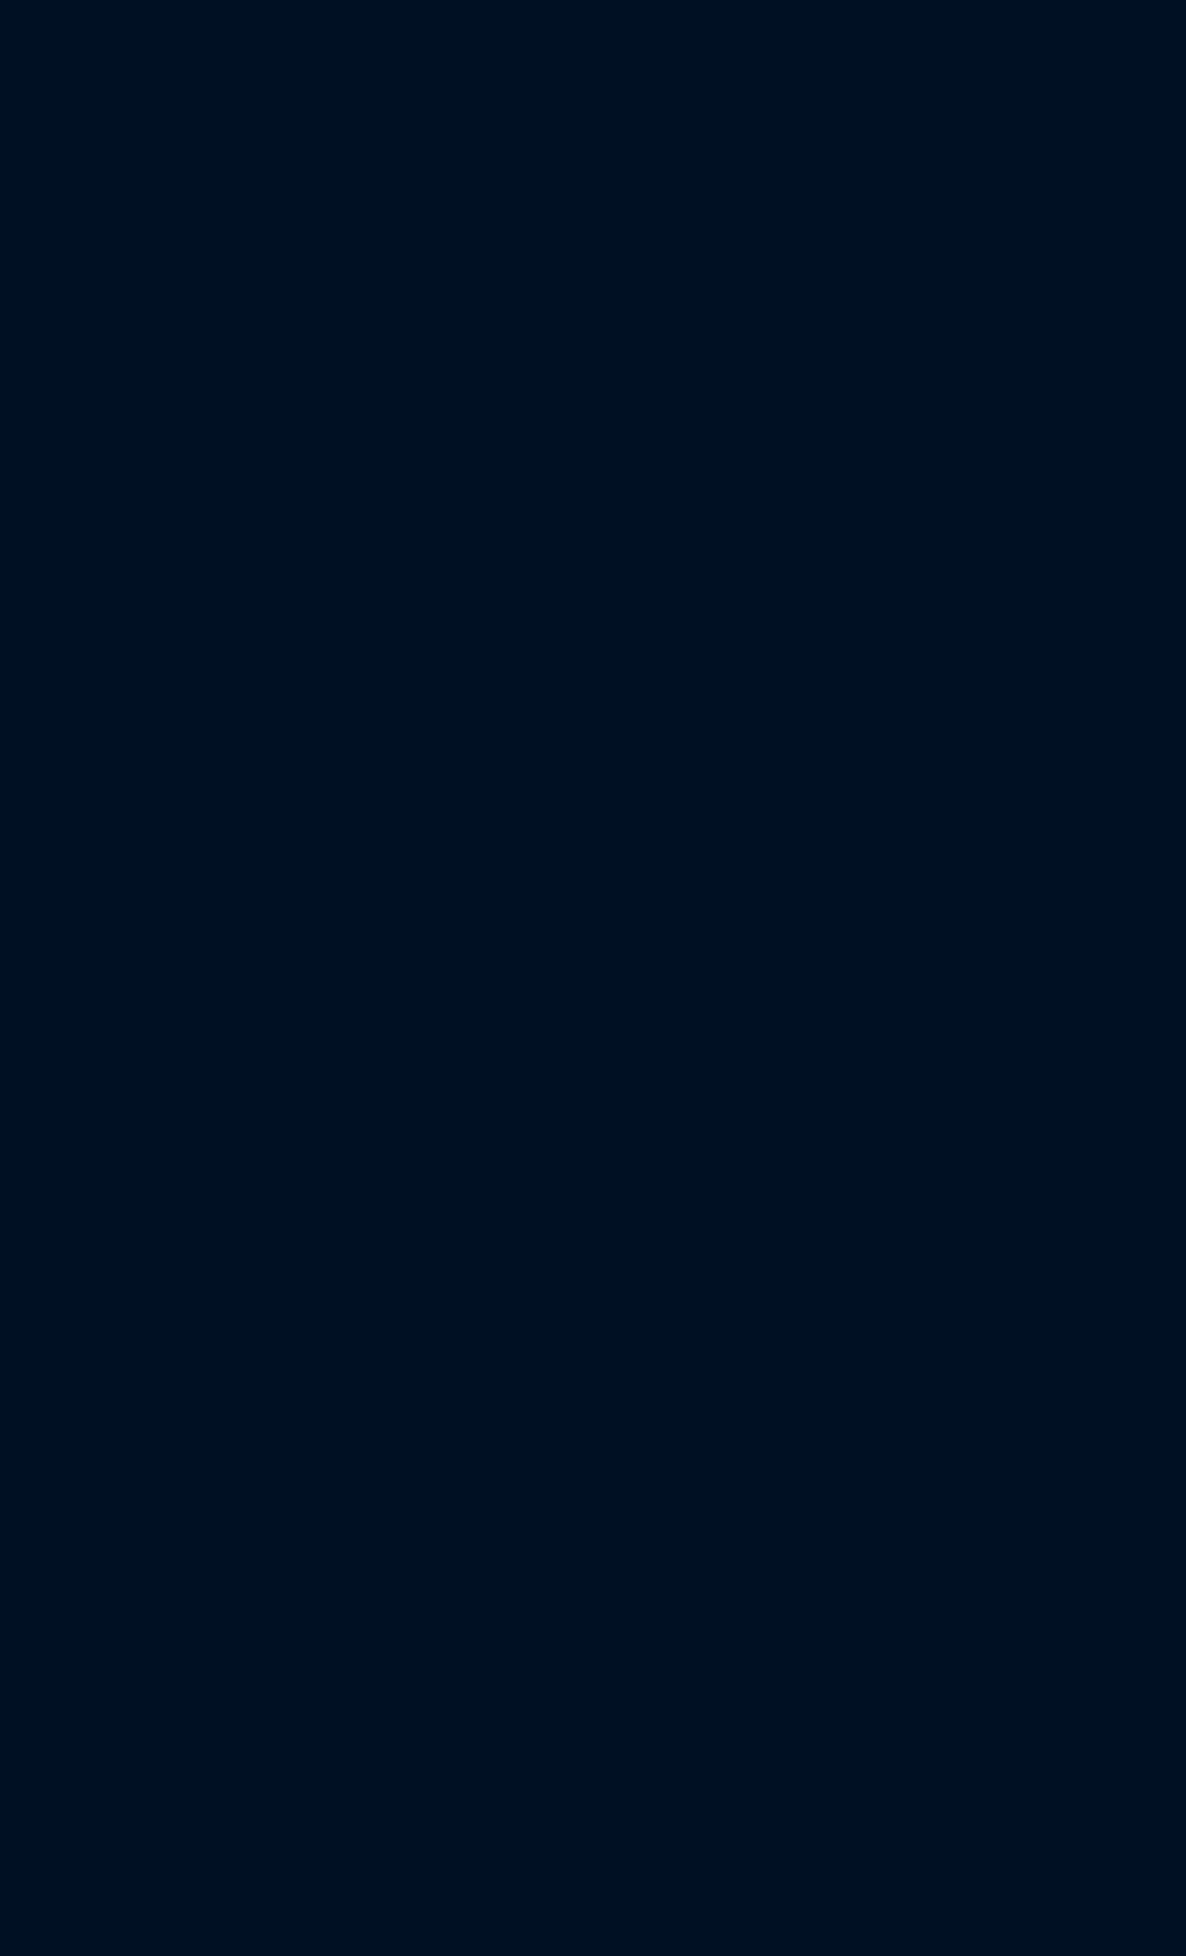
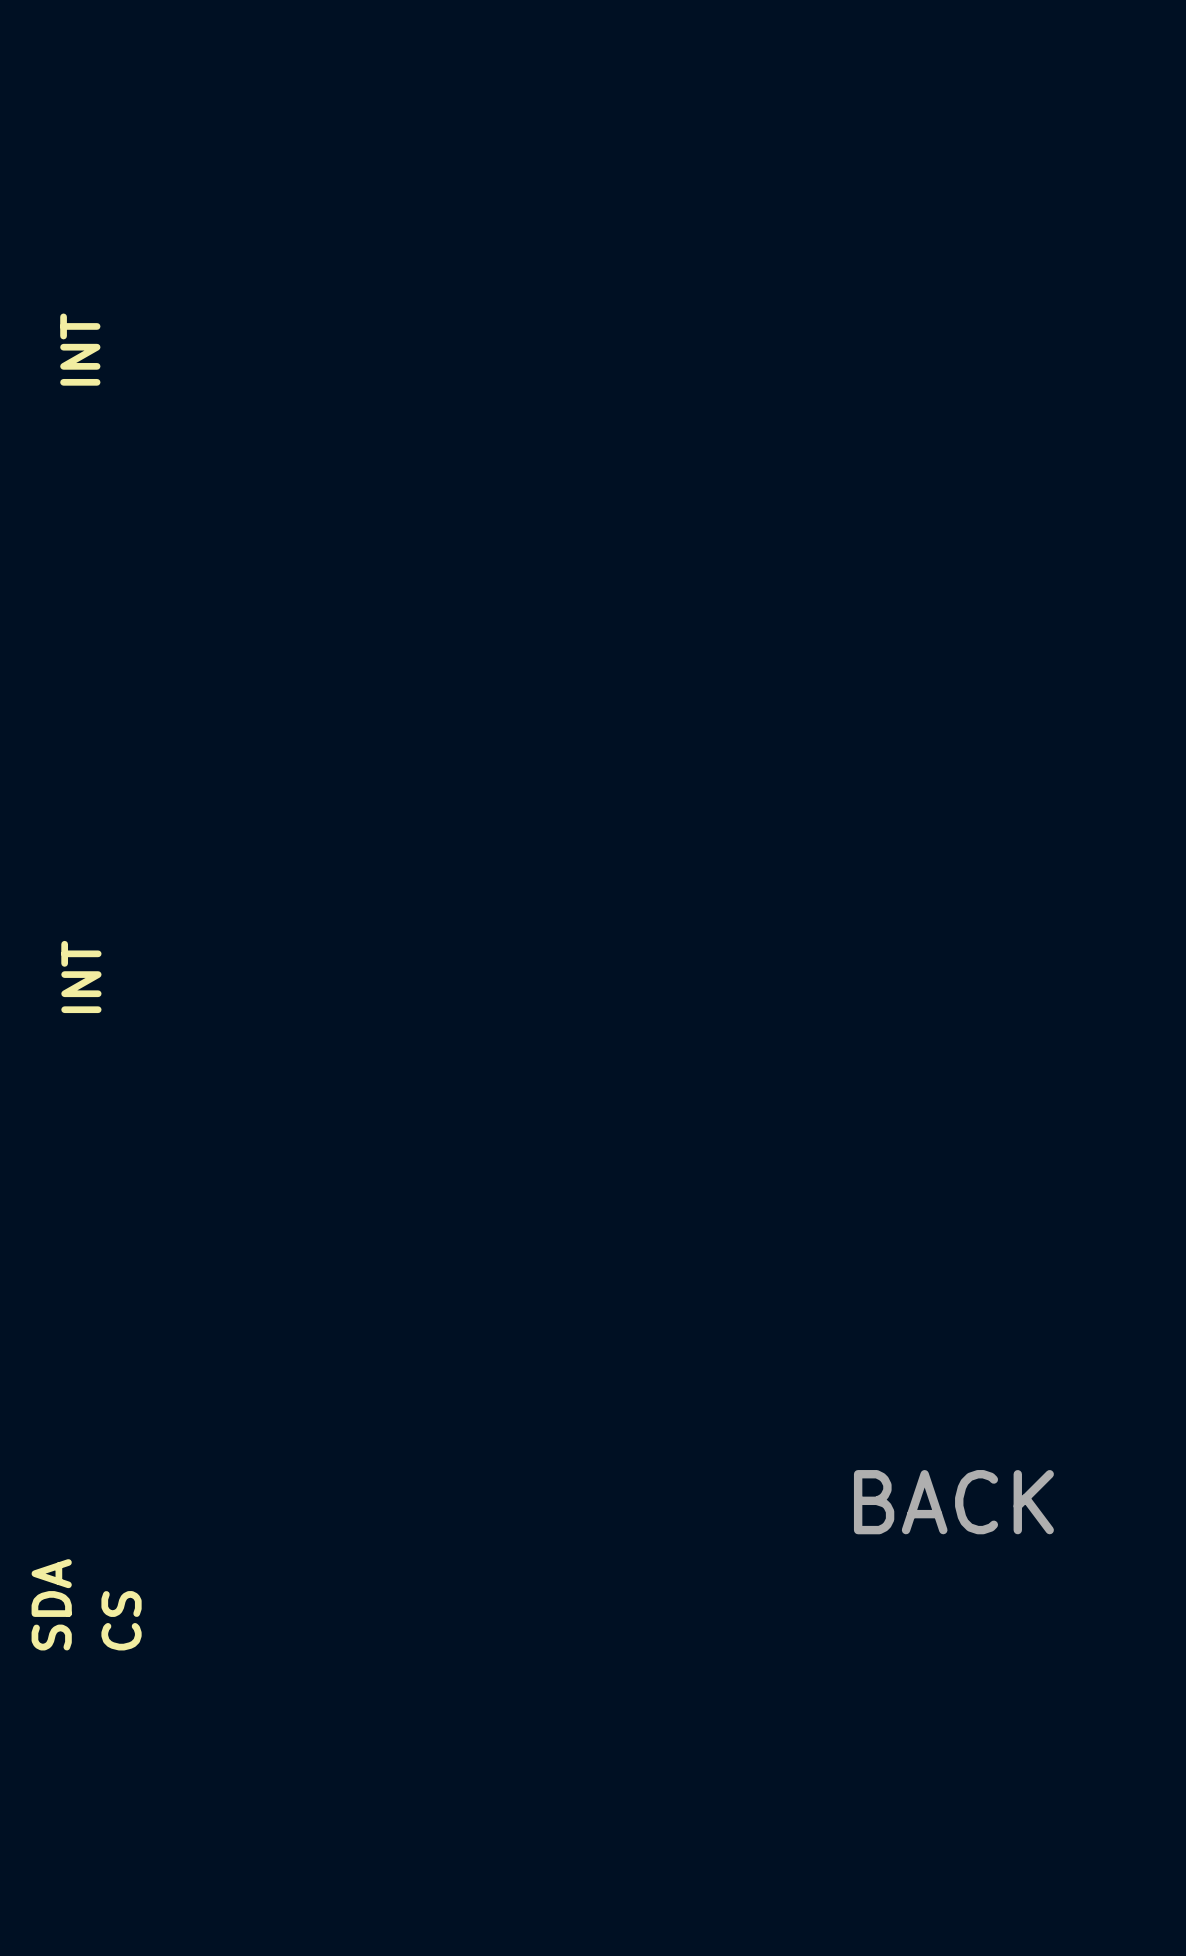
text: none -> INT (80, 349)
text: none -> INT (81, 976)
text: none -> BACK (953, 1502)
text: none -> SDA (51, 1604)
text: none -> CS (121, 1620)

